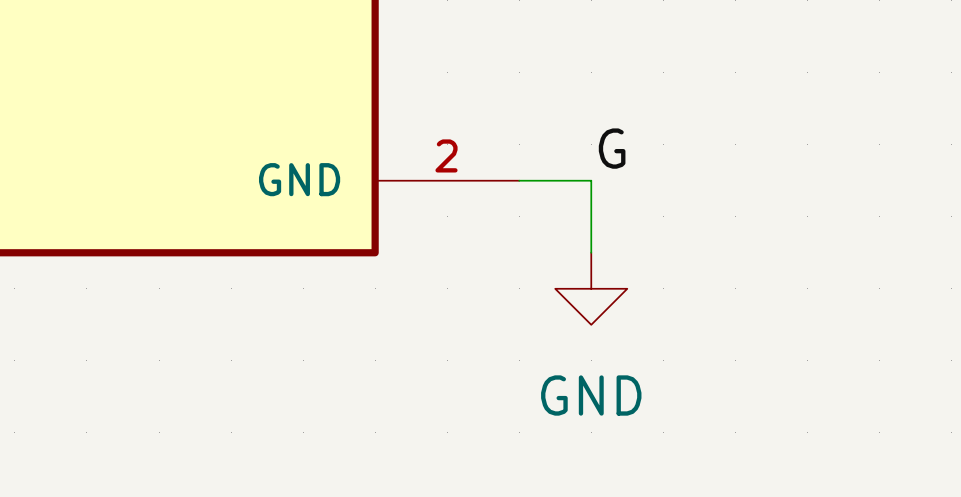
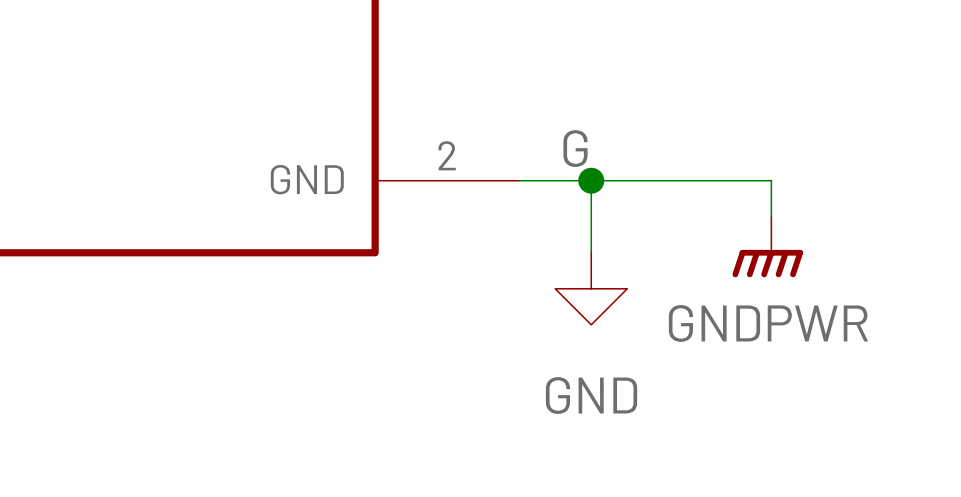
label position: G (612, 148) -> G (575, 148)
wire: none -> (591, 180) (771, 180) (771, 216)
junction: none -> (591, 180)
power symbol: none -> GNDPWR (767, 247)

